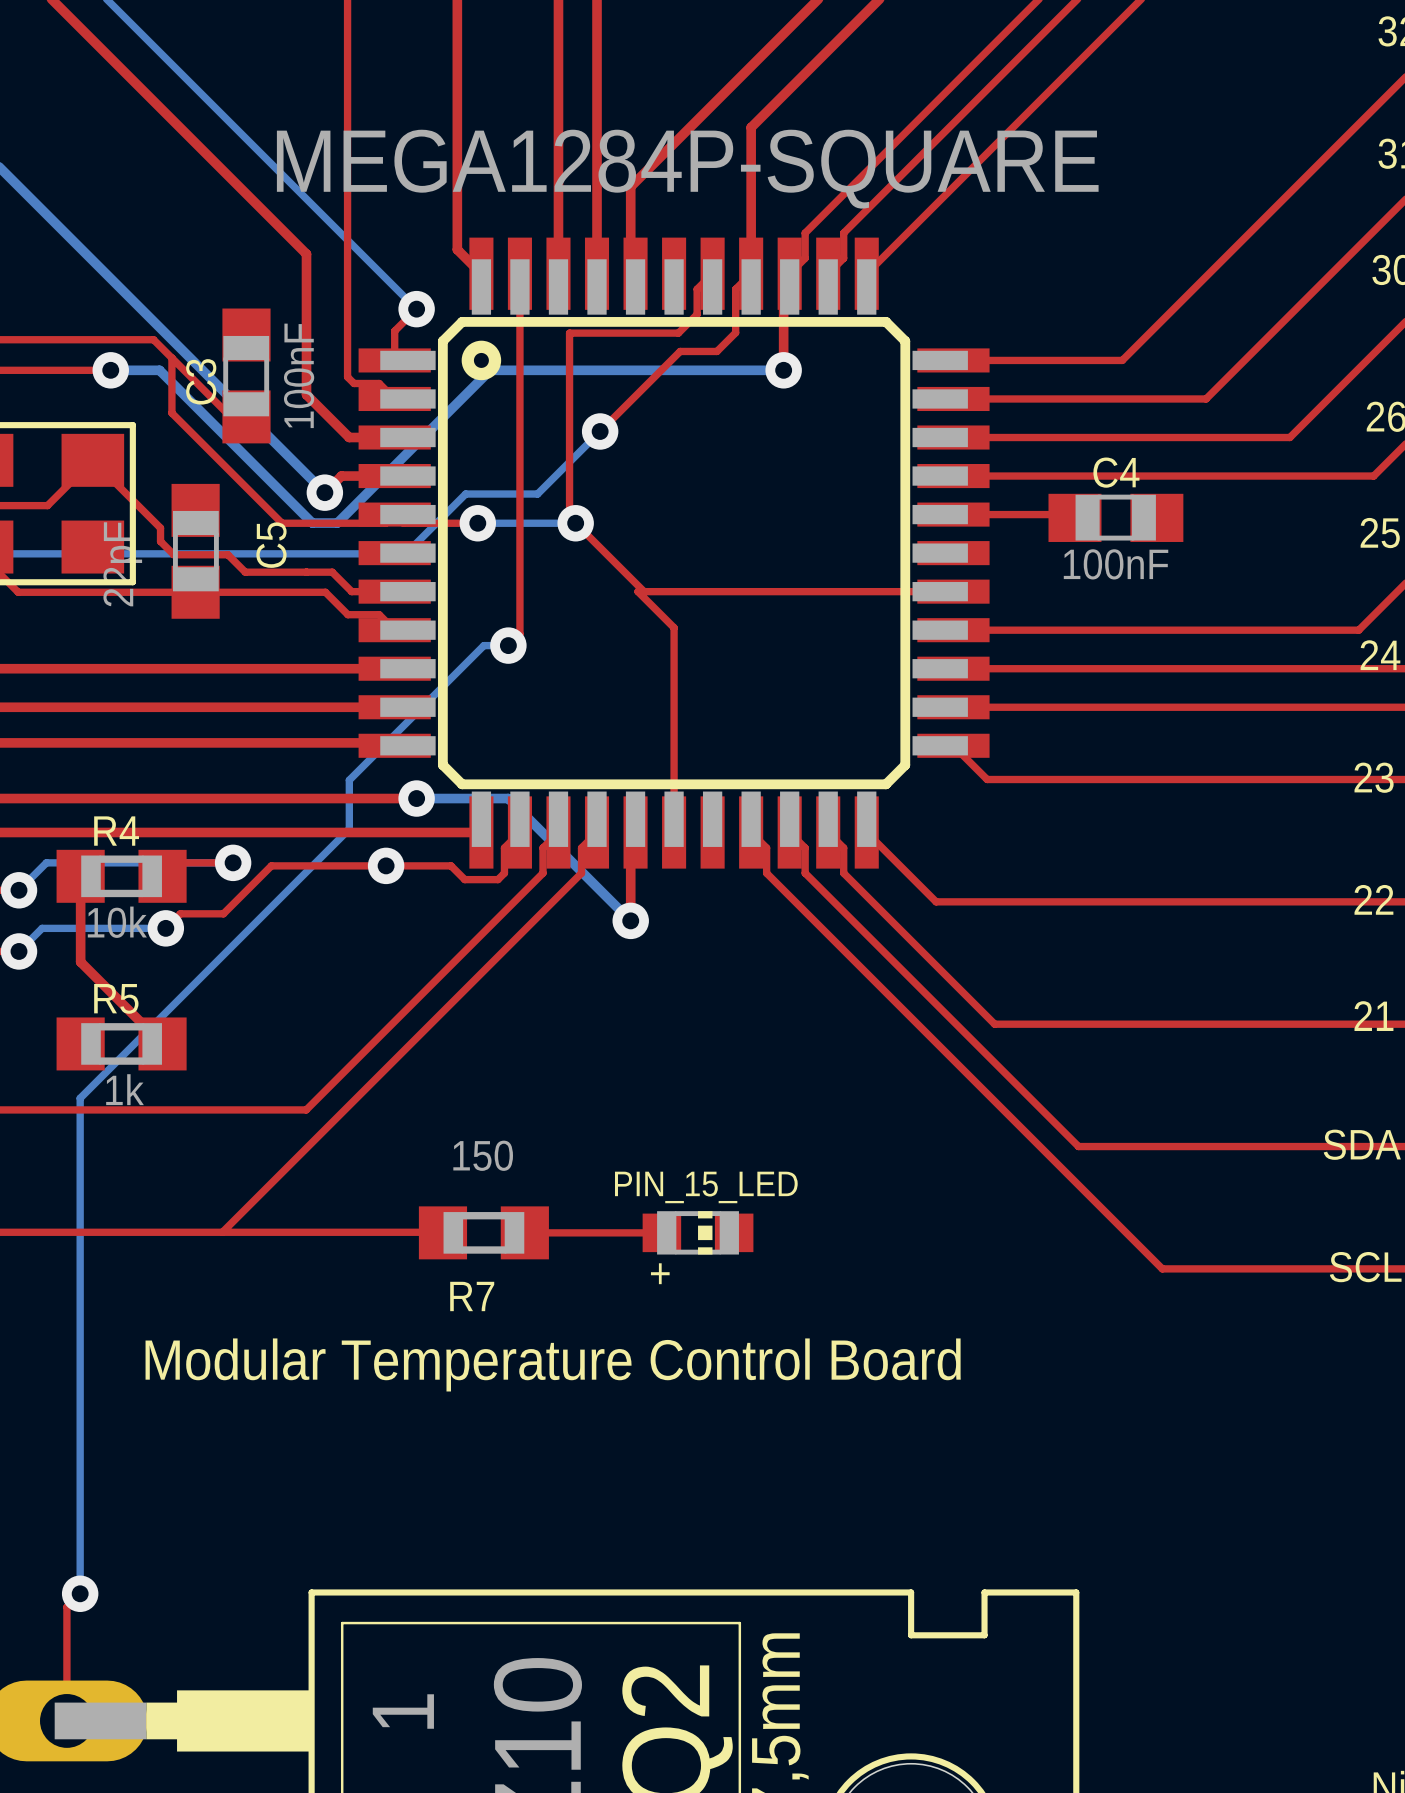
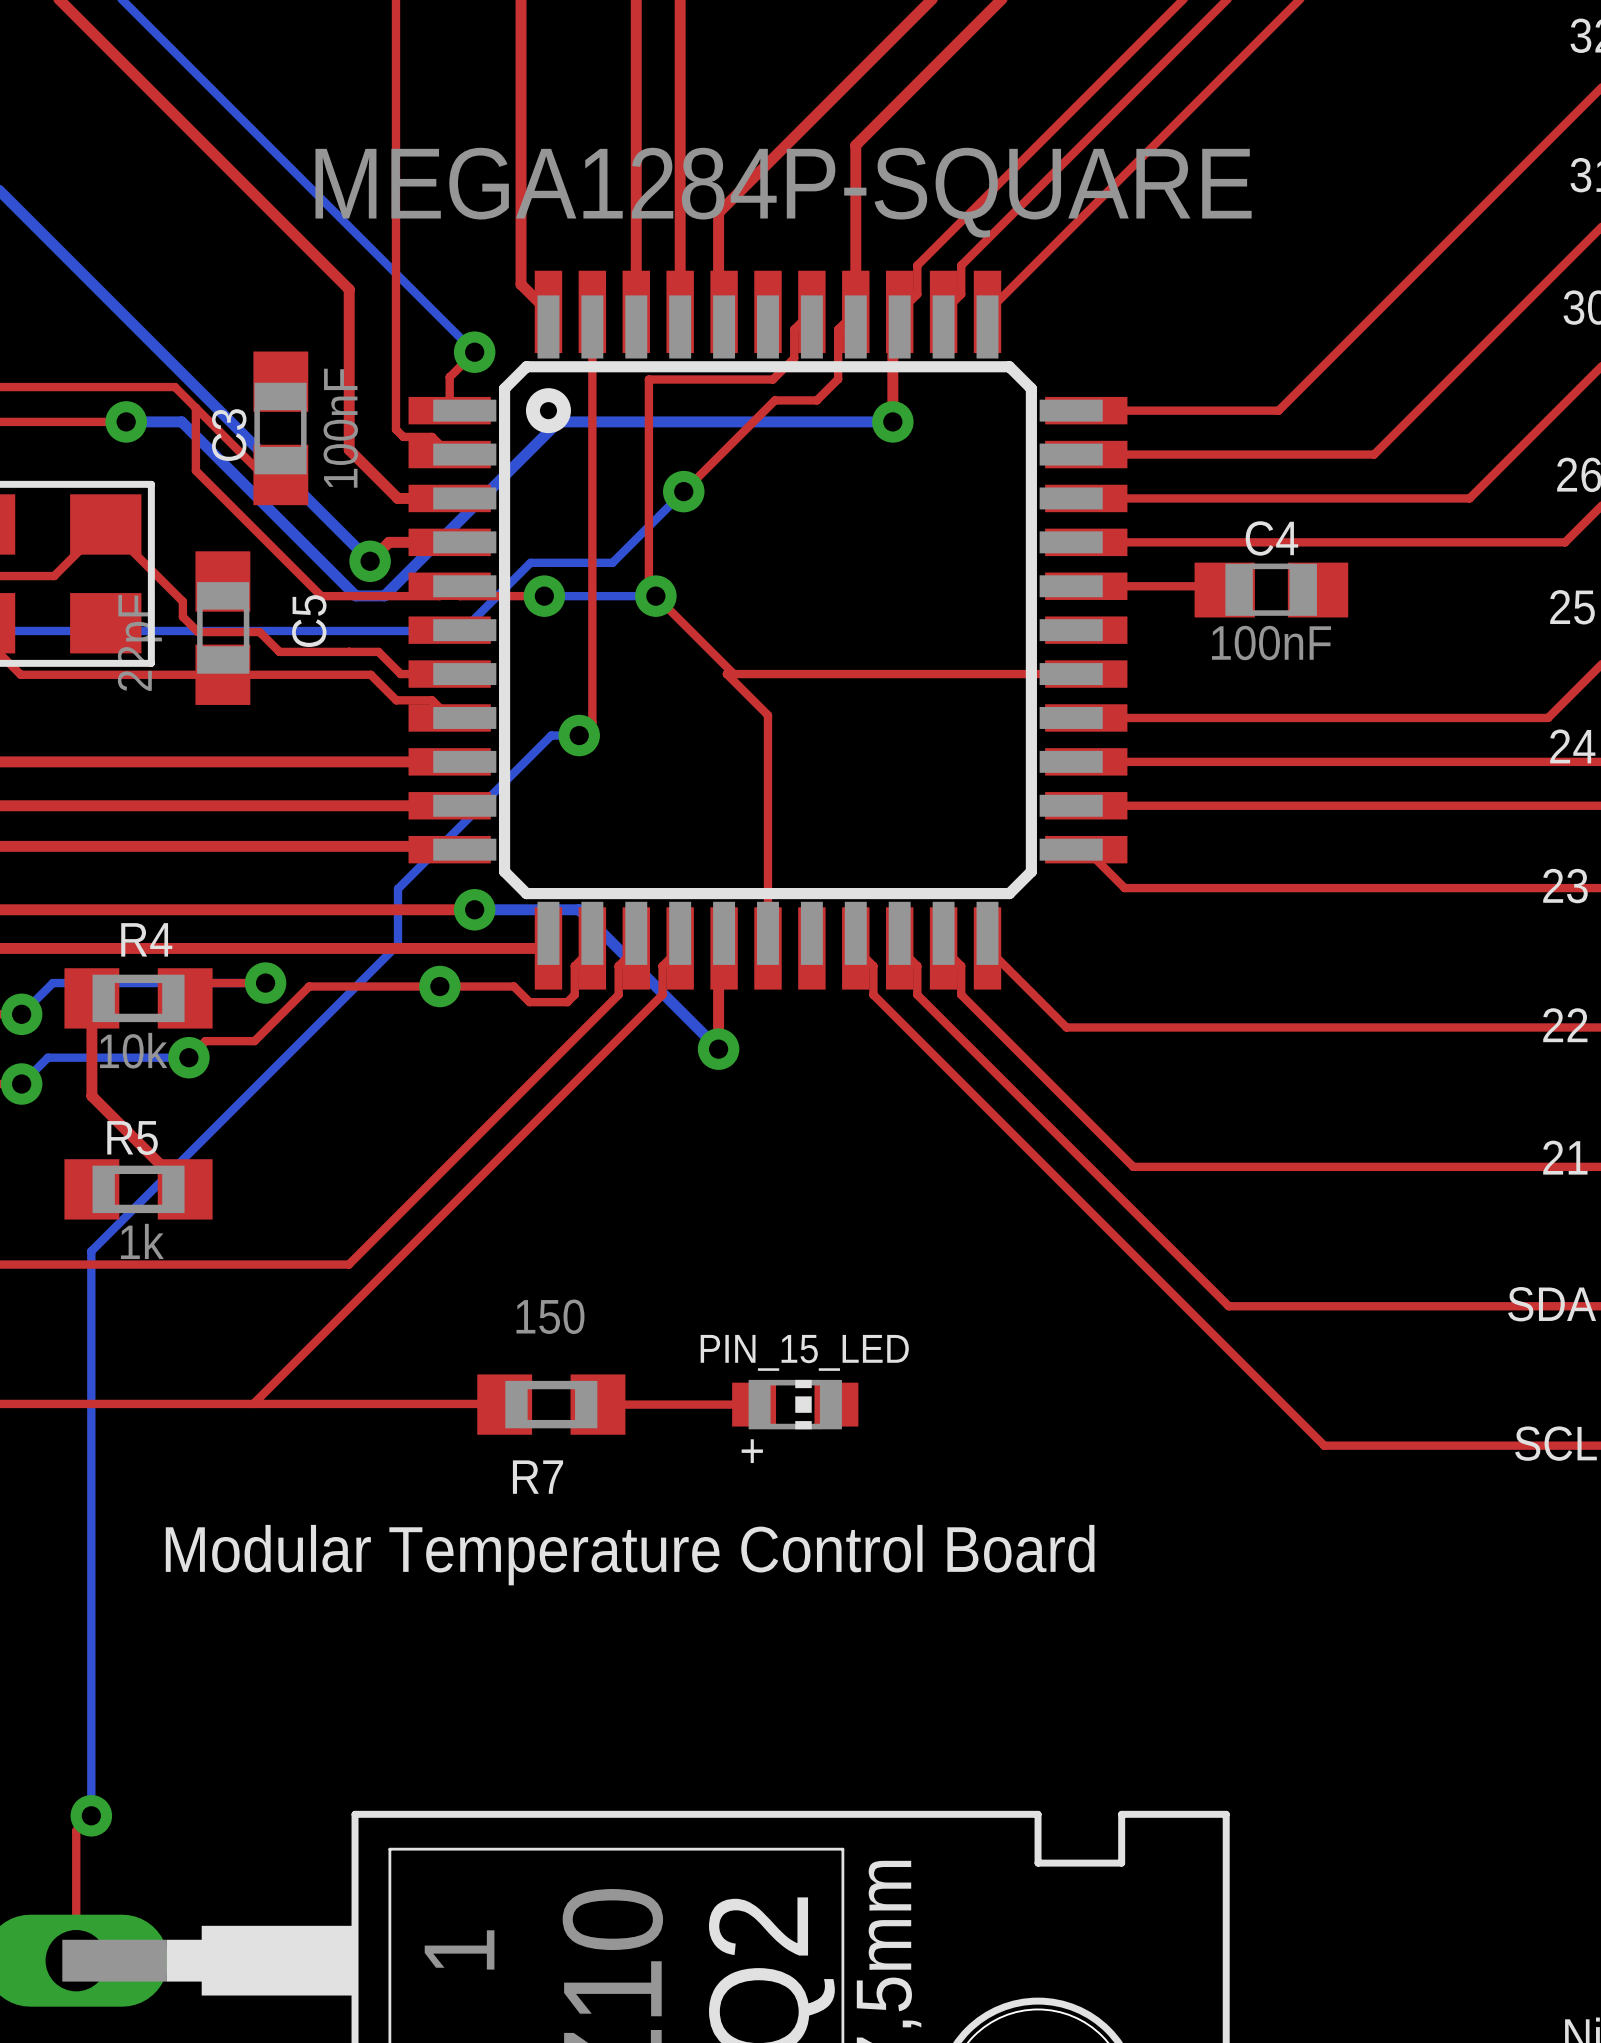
R4 name position: R4 (116, 831) -> R4 (146, 939)

